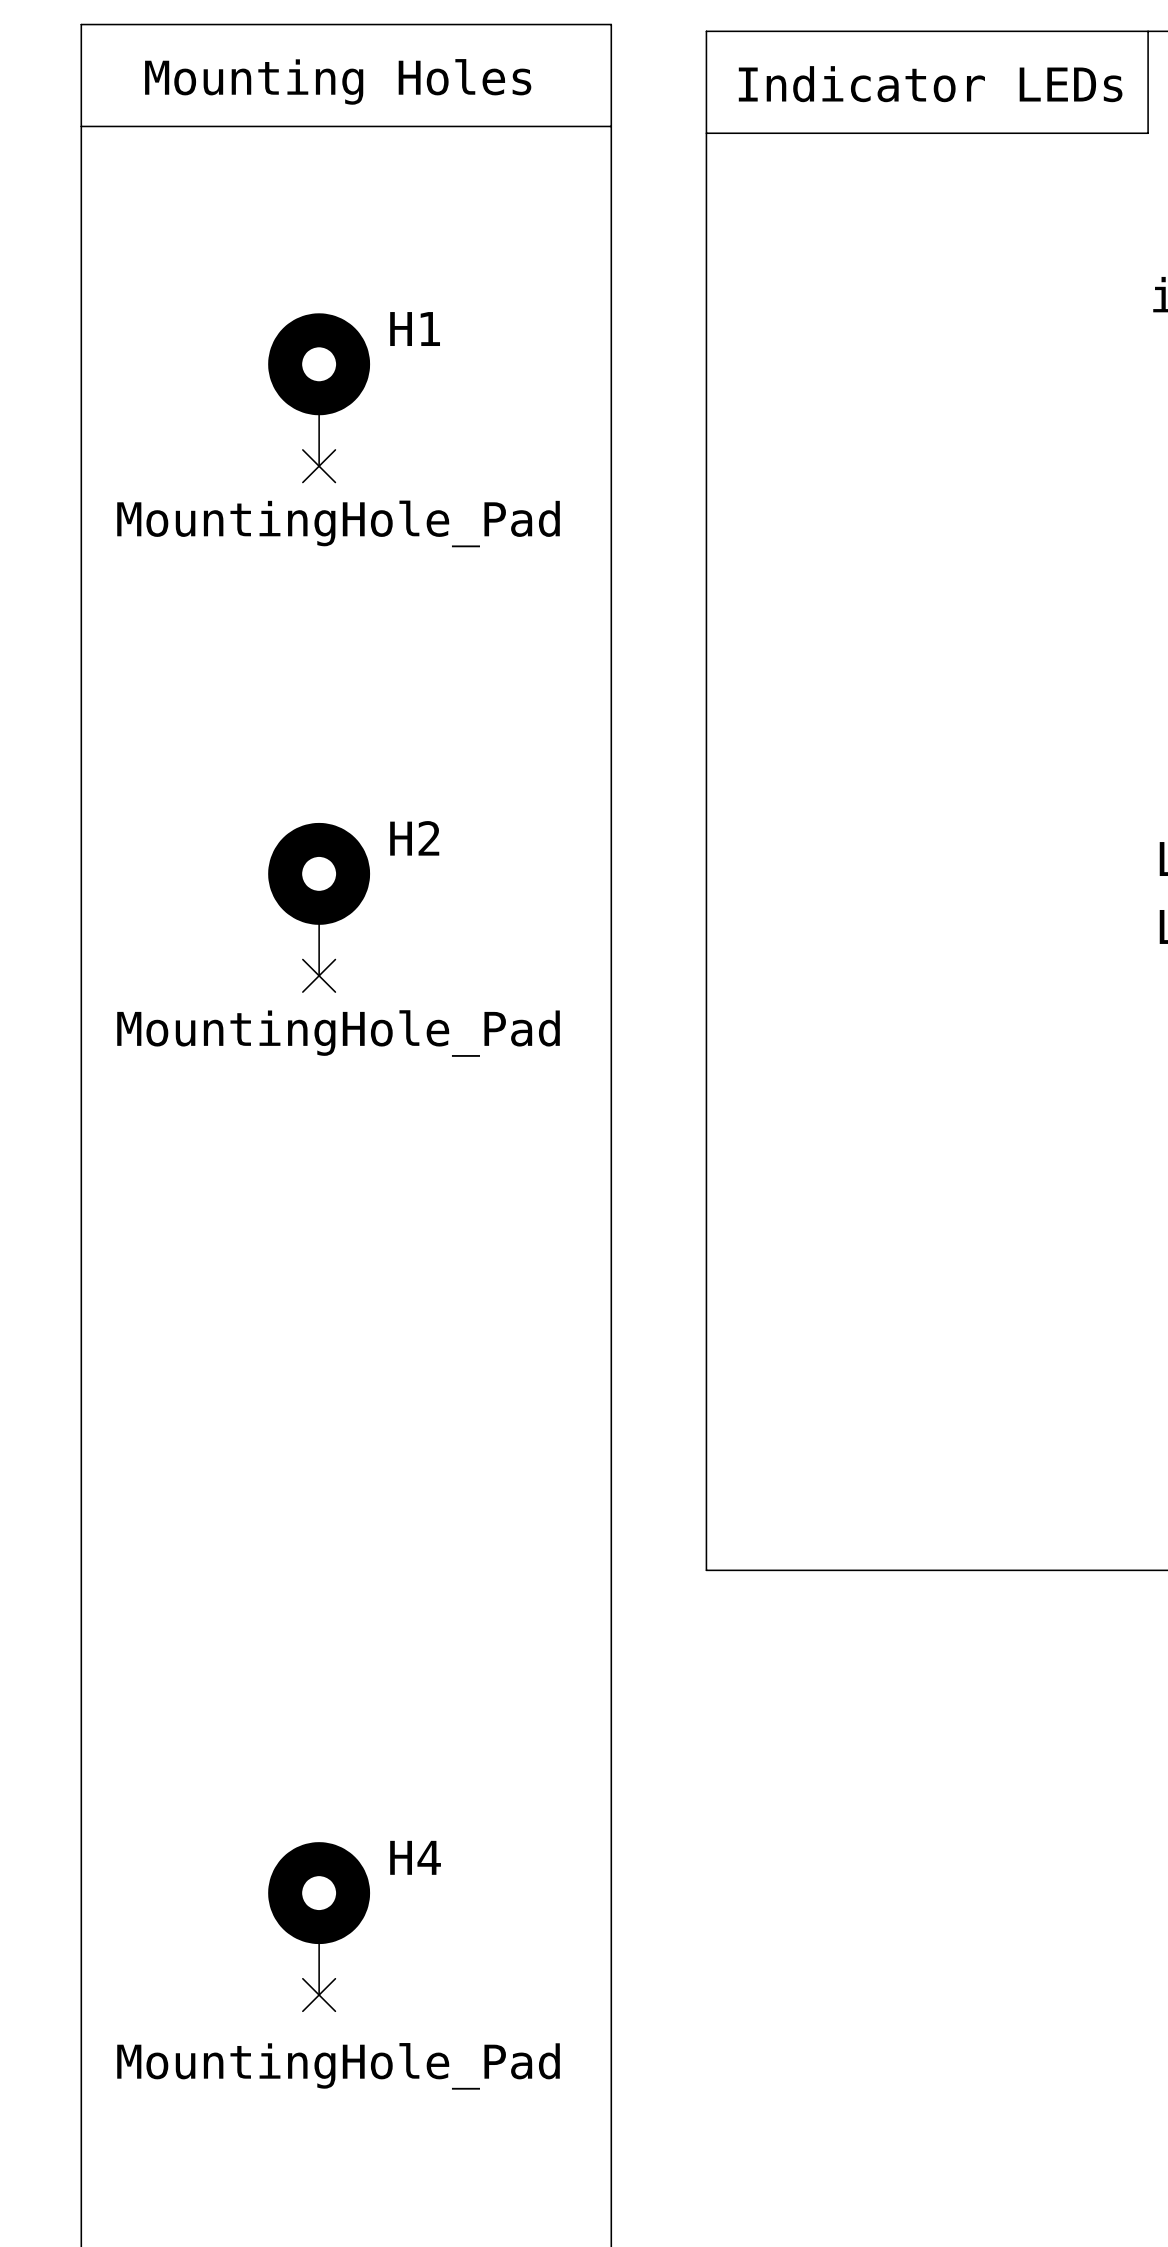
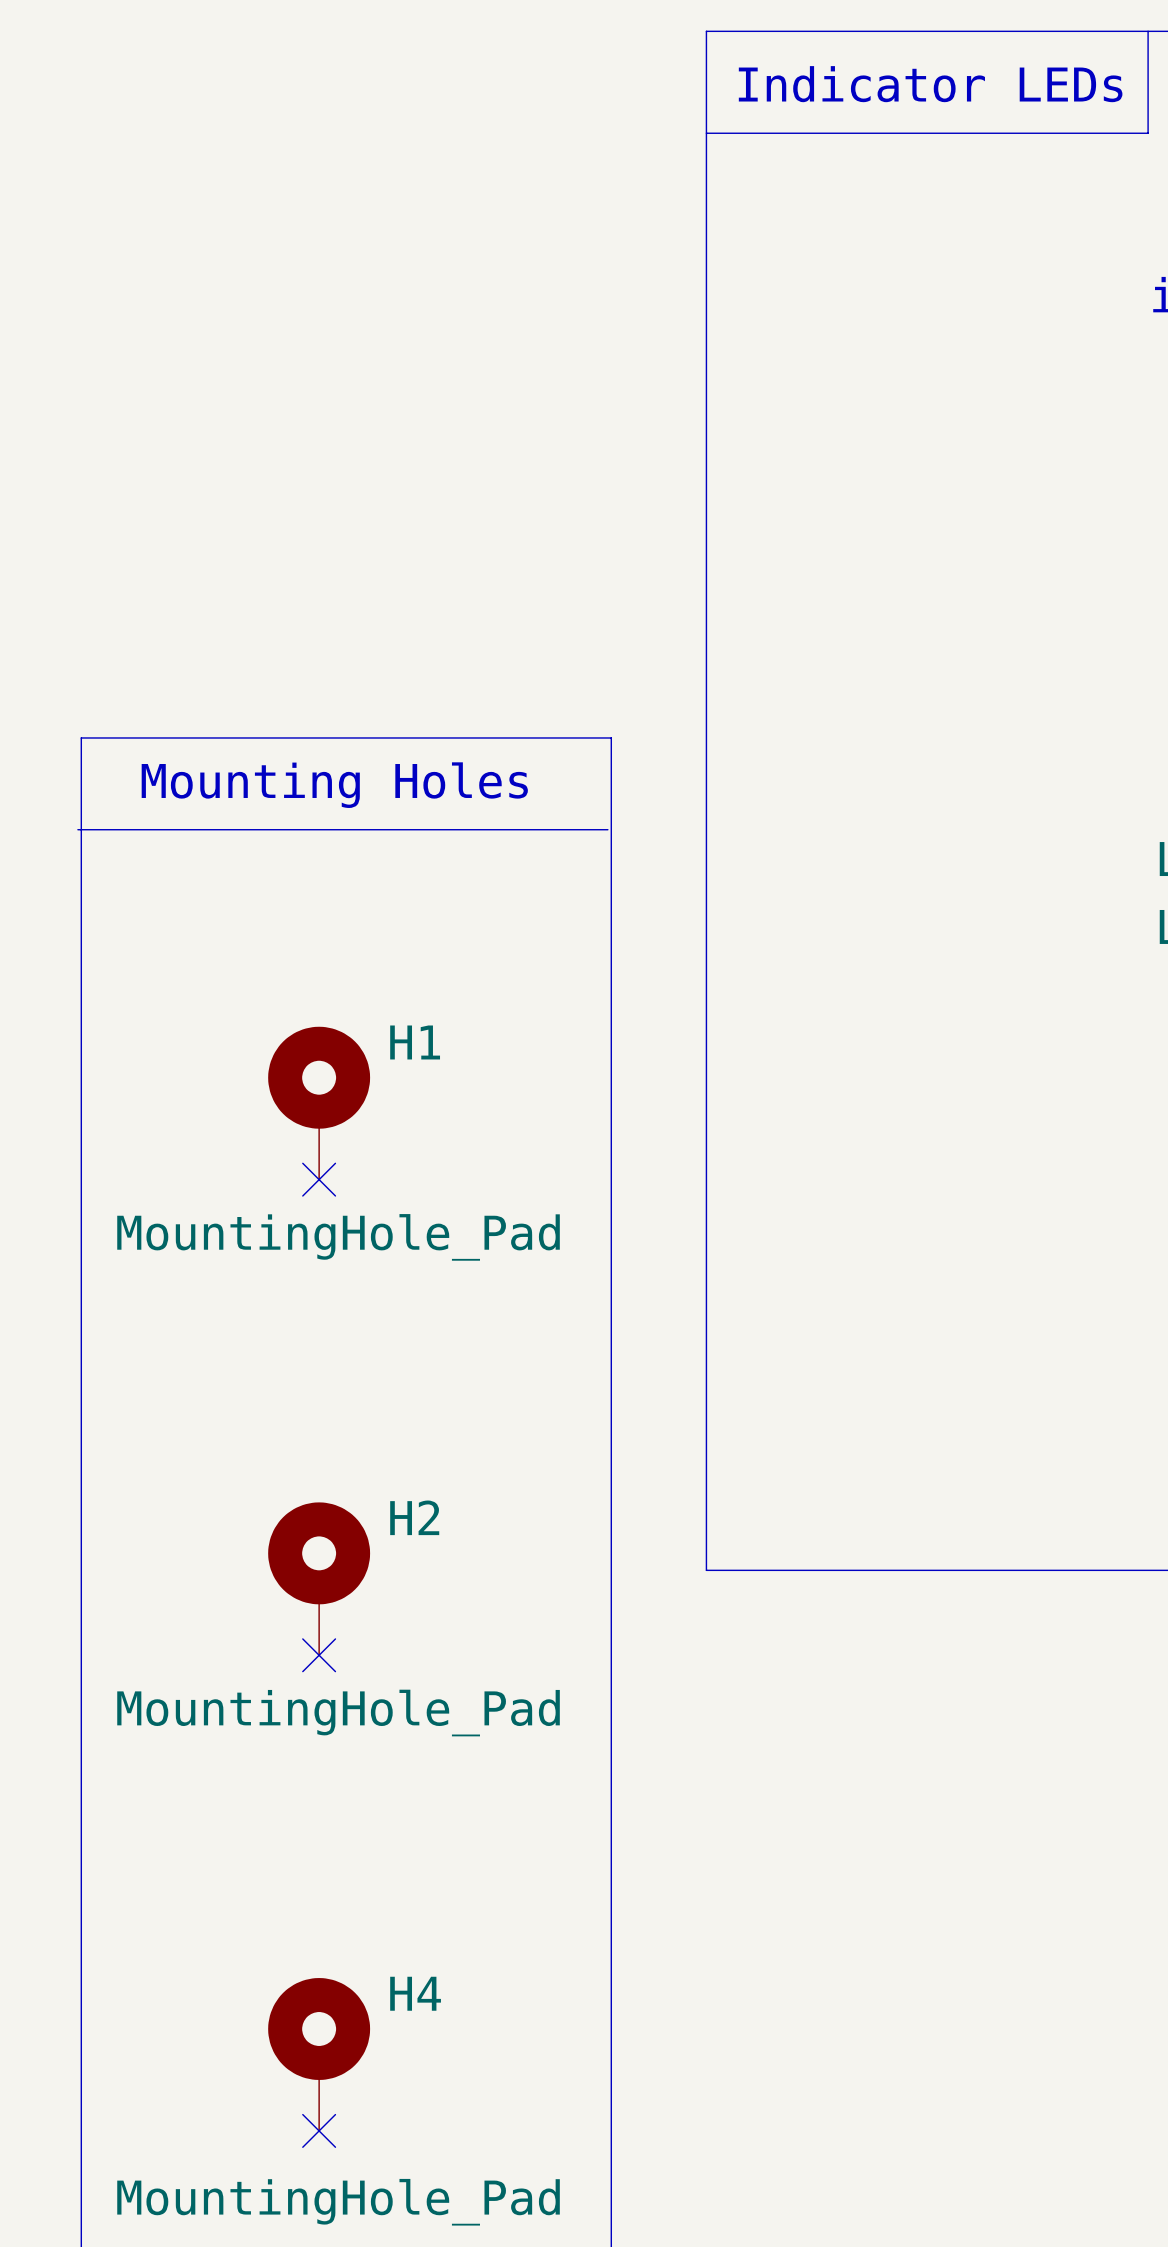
text: Mounting Holes (338, 81) -> none
line: (81, 126) (611, 126) -> none
H1 position: (319, 389) -> (319, 1103)
no-connect mark: (319, 466) -> none
line: (81, 737) (81, 24) (611, 24) (611, 737) -> (81, 737) (611, 737)
text: none -> Mounting Holes (334, 785)
line: none -> (77, 829) (607, 829)
H2 position: (319, 899) -> (319, 1578)
no-connect mark: (319, 975) -> none
no-connect mark: none -> (319, 1179)
no-connect mark: none -> (319, 1655)
H4 position: (319, 1918) -> (319, 2054)
no-connect mark position: (319, 1995) -> (319, 2130)

